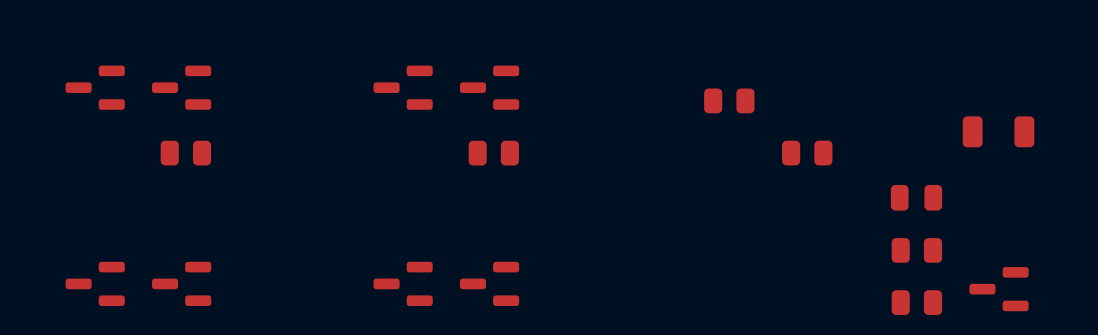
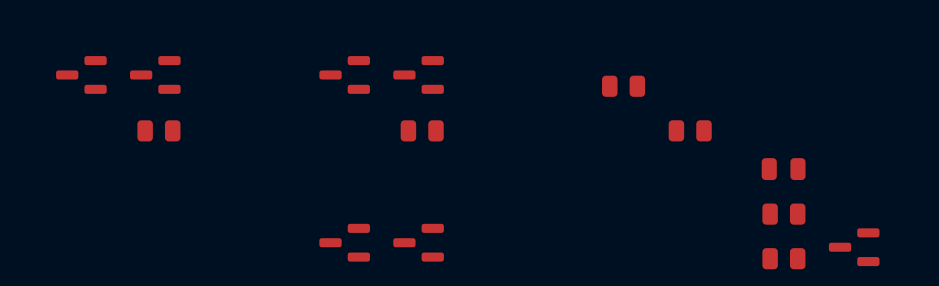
part: (998, 131) -> none
part: (95, 283) -> none
part: (181, 283) -> none

